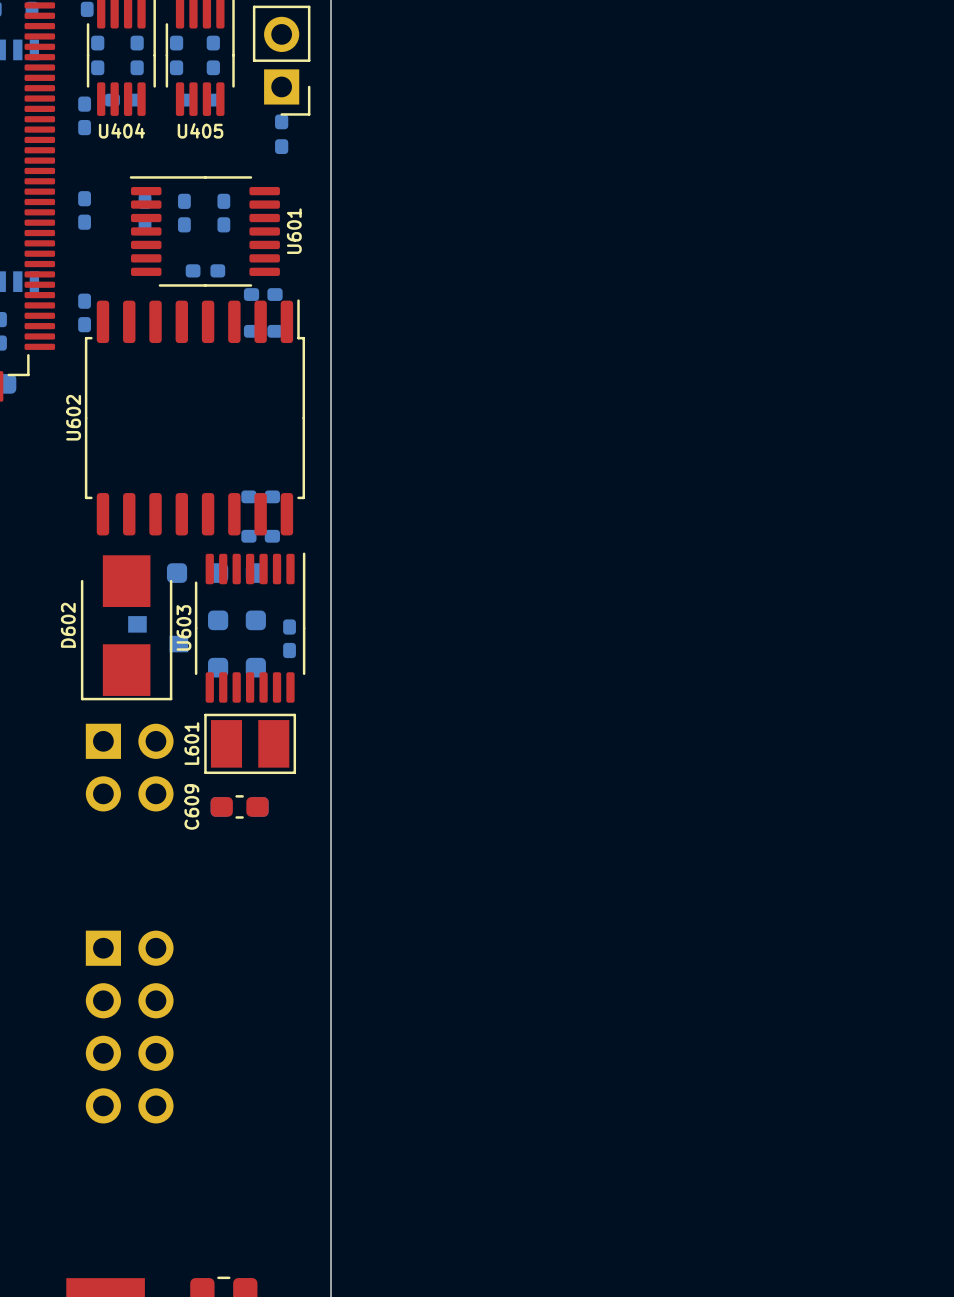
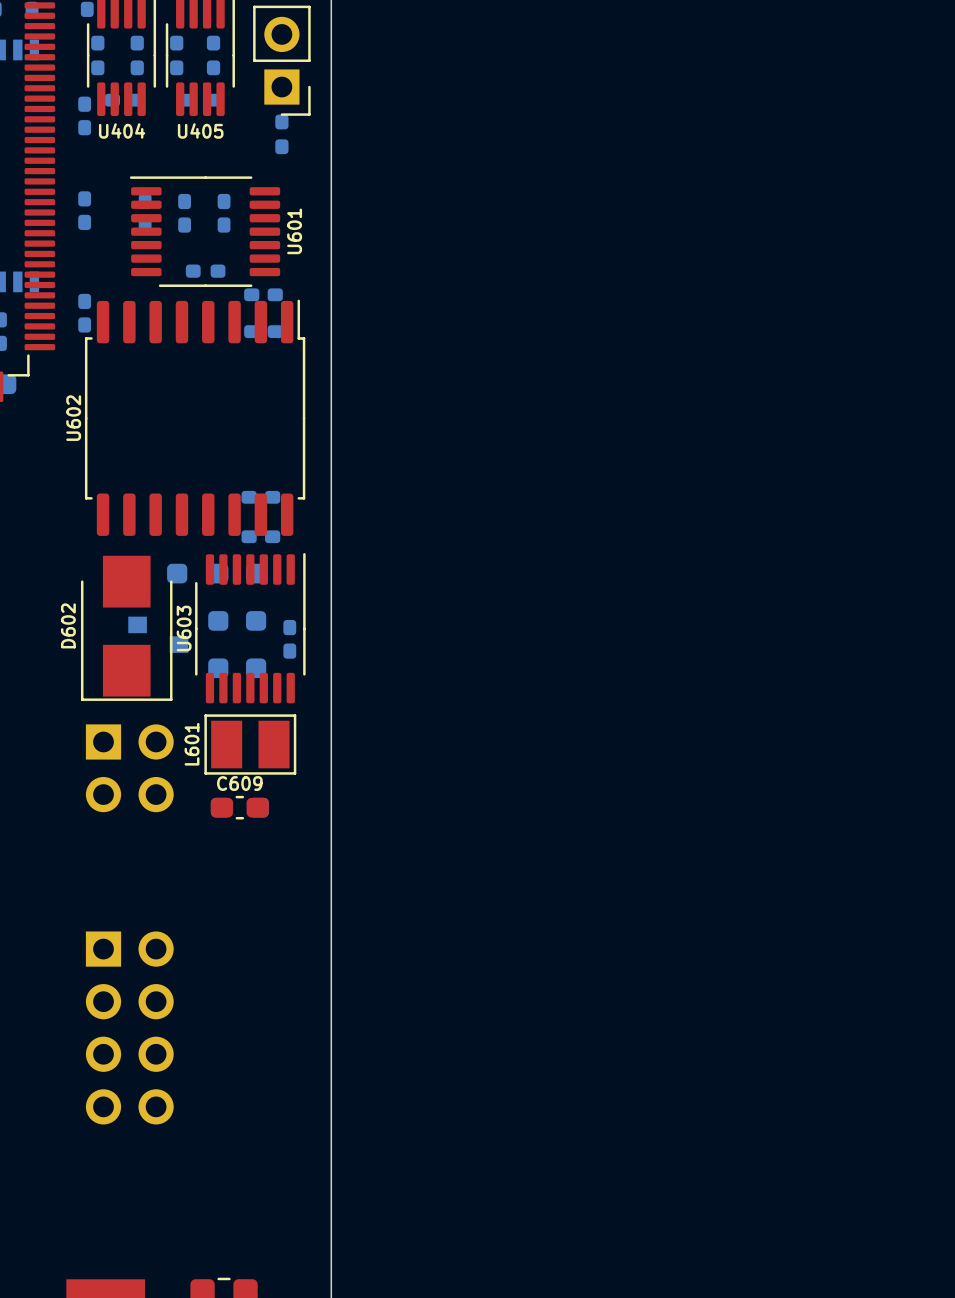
C609 name rotation: 0° (191, 806) -> 90° clockwise (239, 783)

